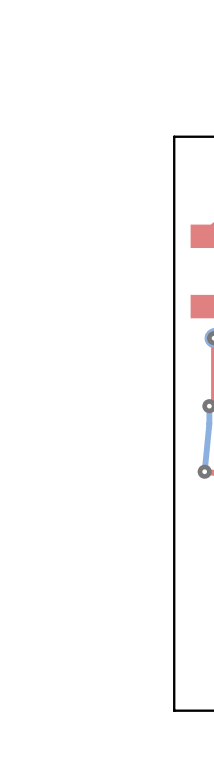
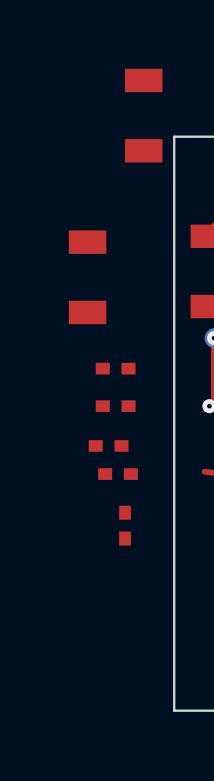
part: none -> (143, 115)
part: none -> (87, 277)
part: none -> (115, 368)
part: none -> (115, 406)
bottom track: (209, 406) (204, 471) -> none
part: none -> (108, 445)
via: (204, 471) -> none
part: none -> (117, 474)
part: none -> (125, 525)

